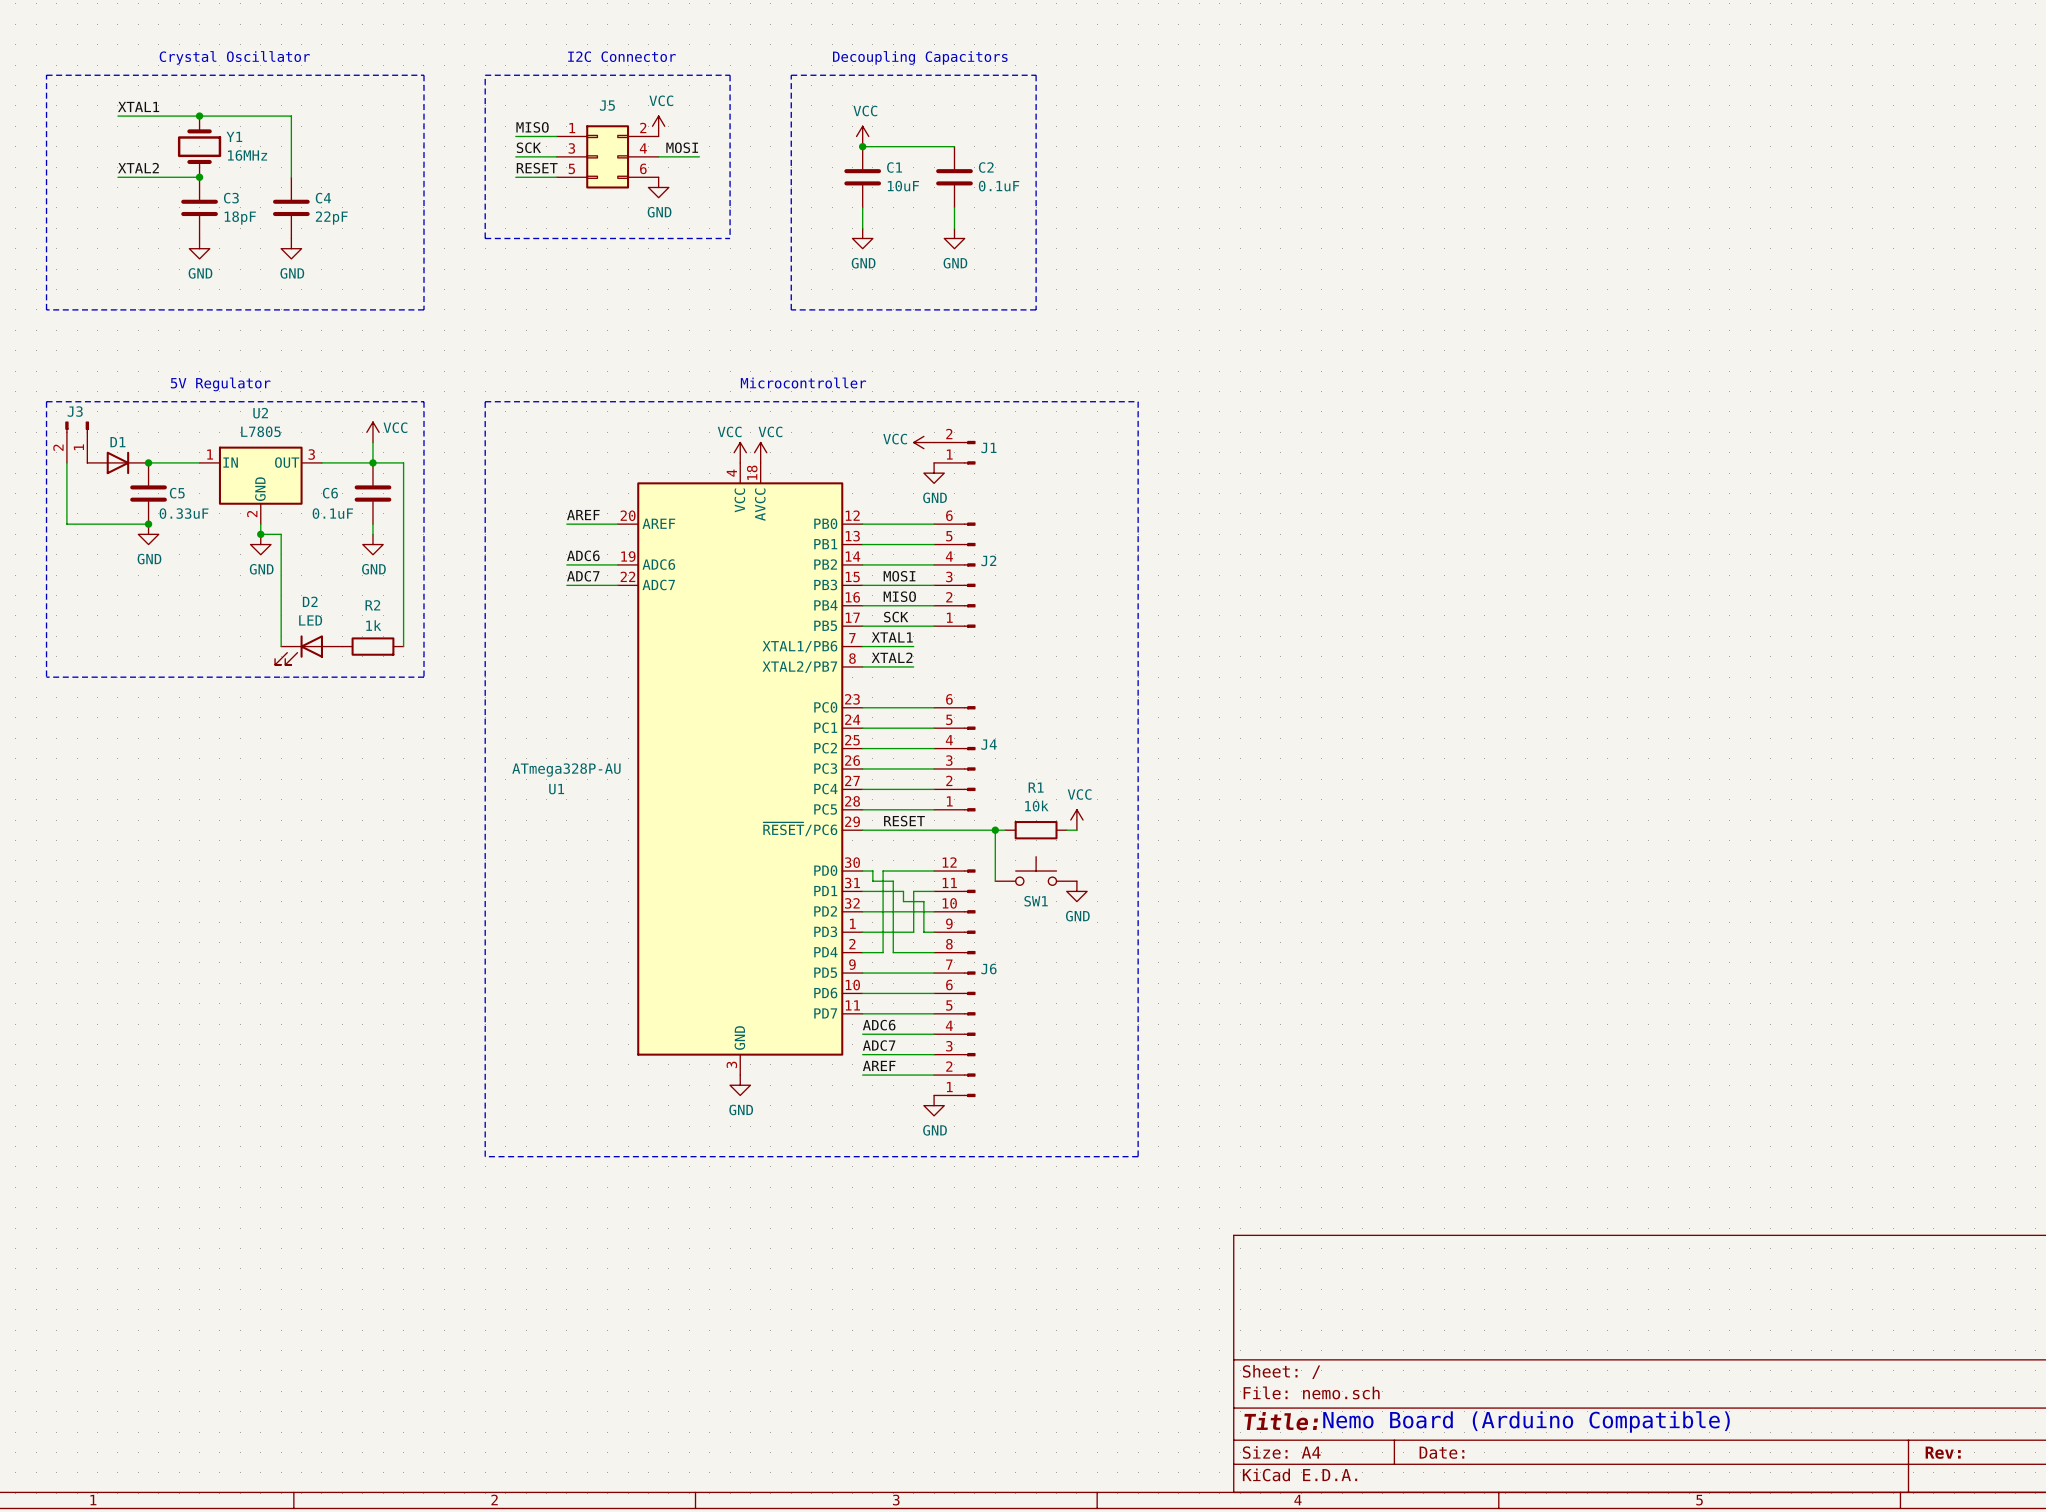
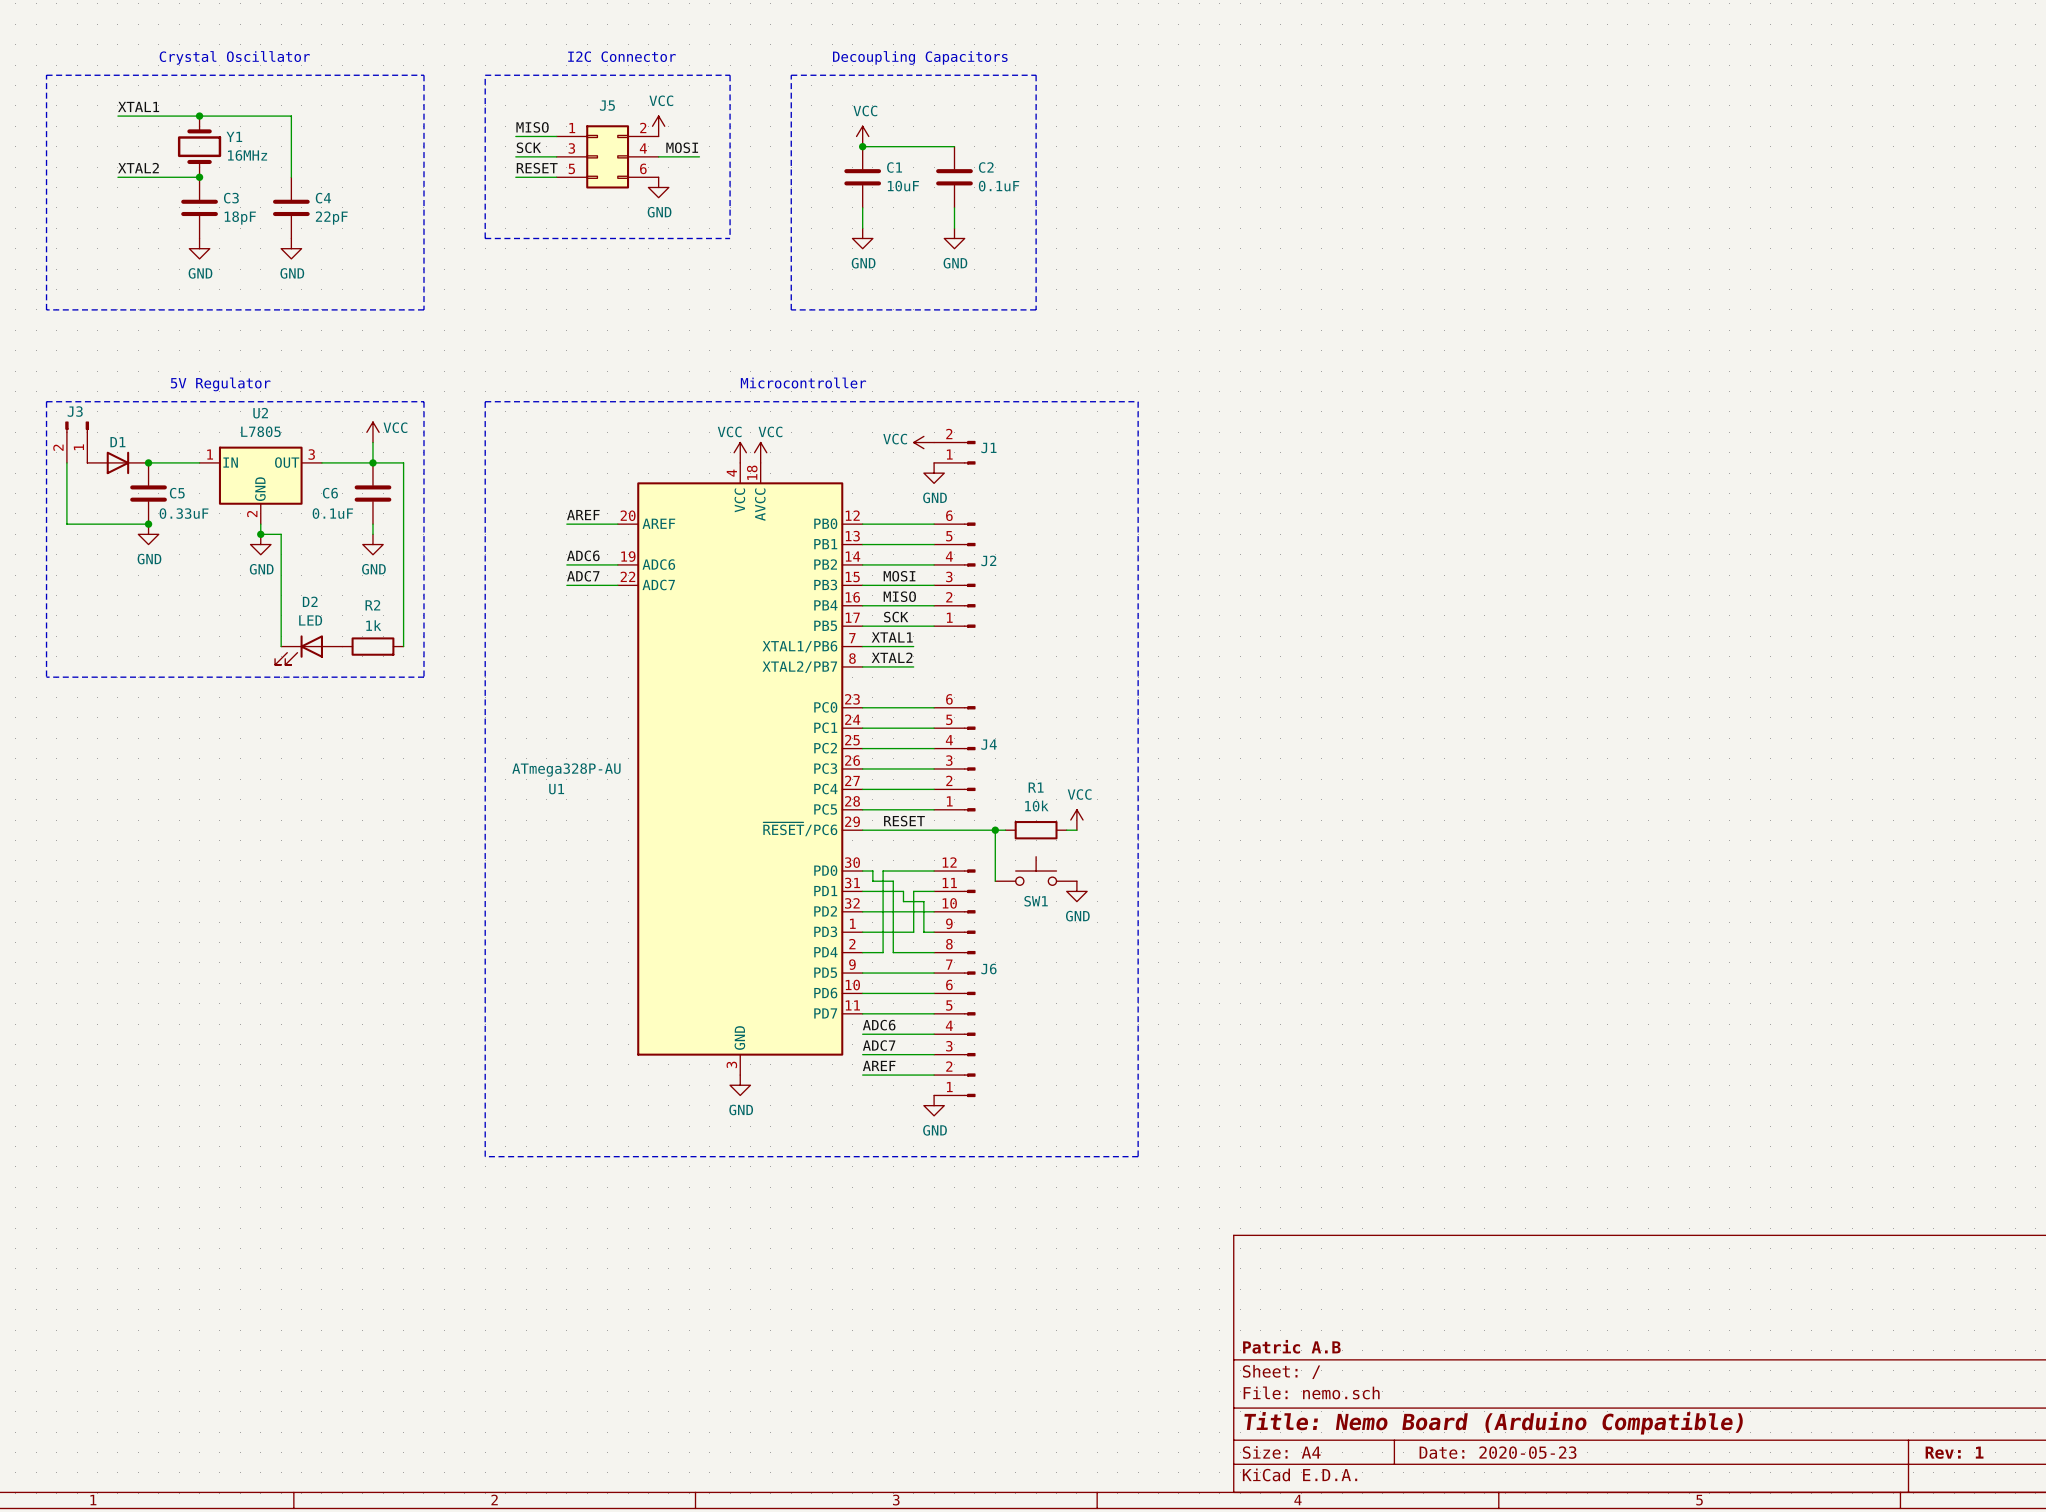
title block: none -> Patric A.B (1291, 1346)
title block: Title: (1281, 1421) -> Title: Nemo Board (Arduino Compatible) (1493, 1423)
text: Nemo Board (Arduino Compatible) (1526, 1421) -> none
title block: Date: (1441, 1452) -> Date: 2020-05-23 (1498, 1452)
title block: Rev: (1943, 1452) -> Rev: 1 (1954, 1452)

